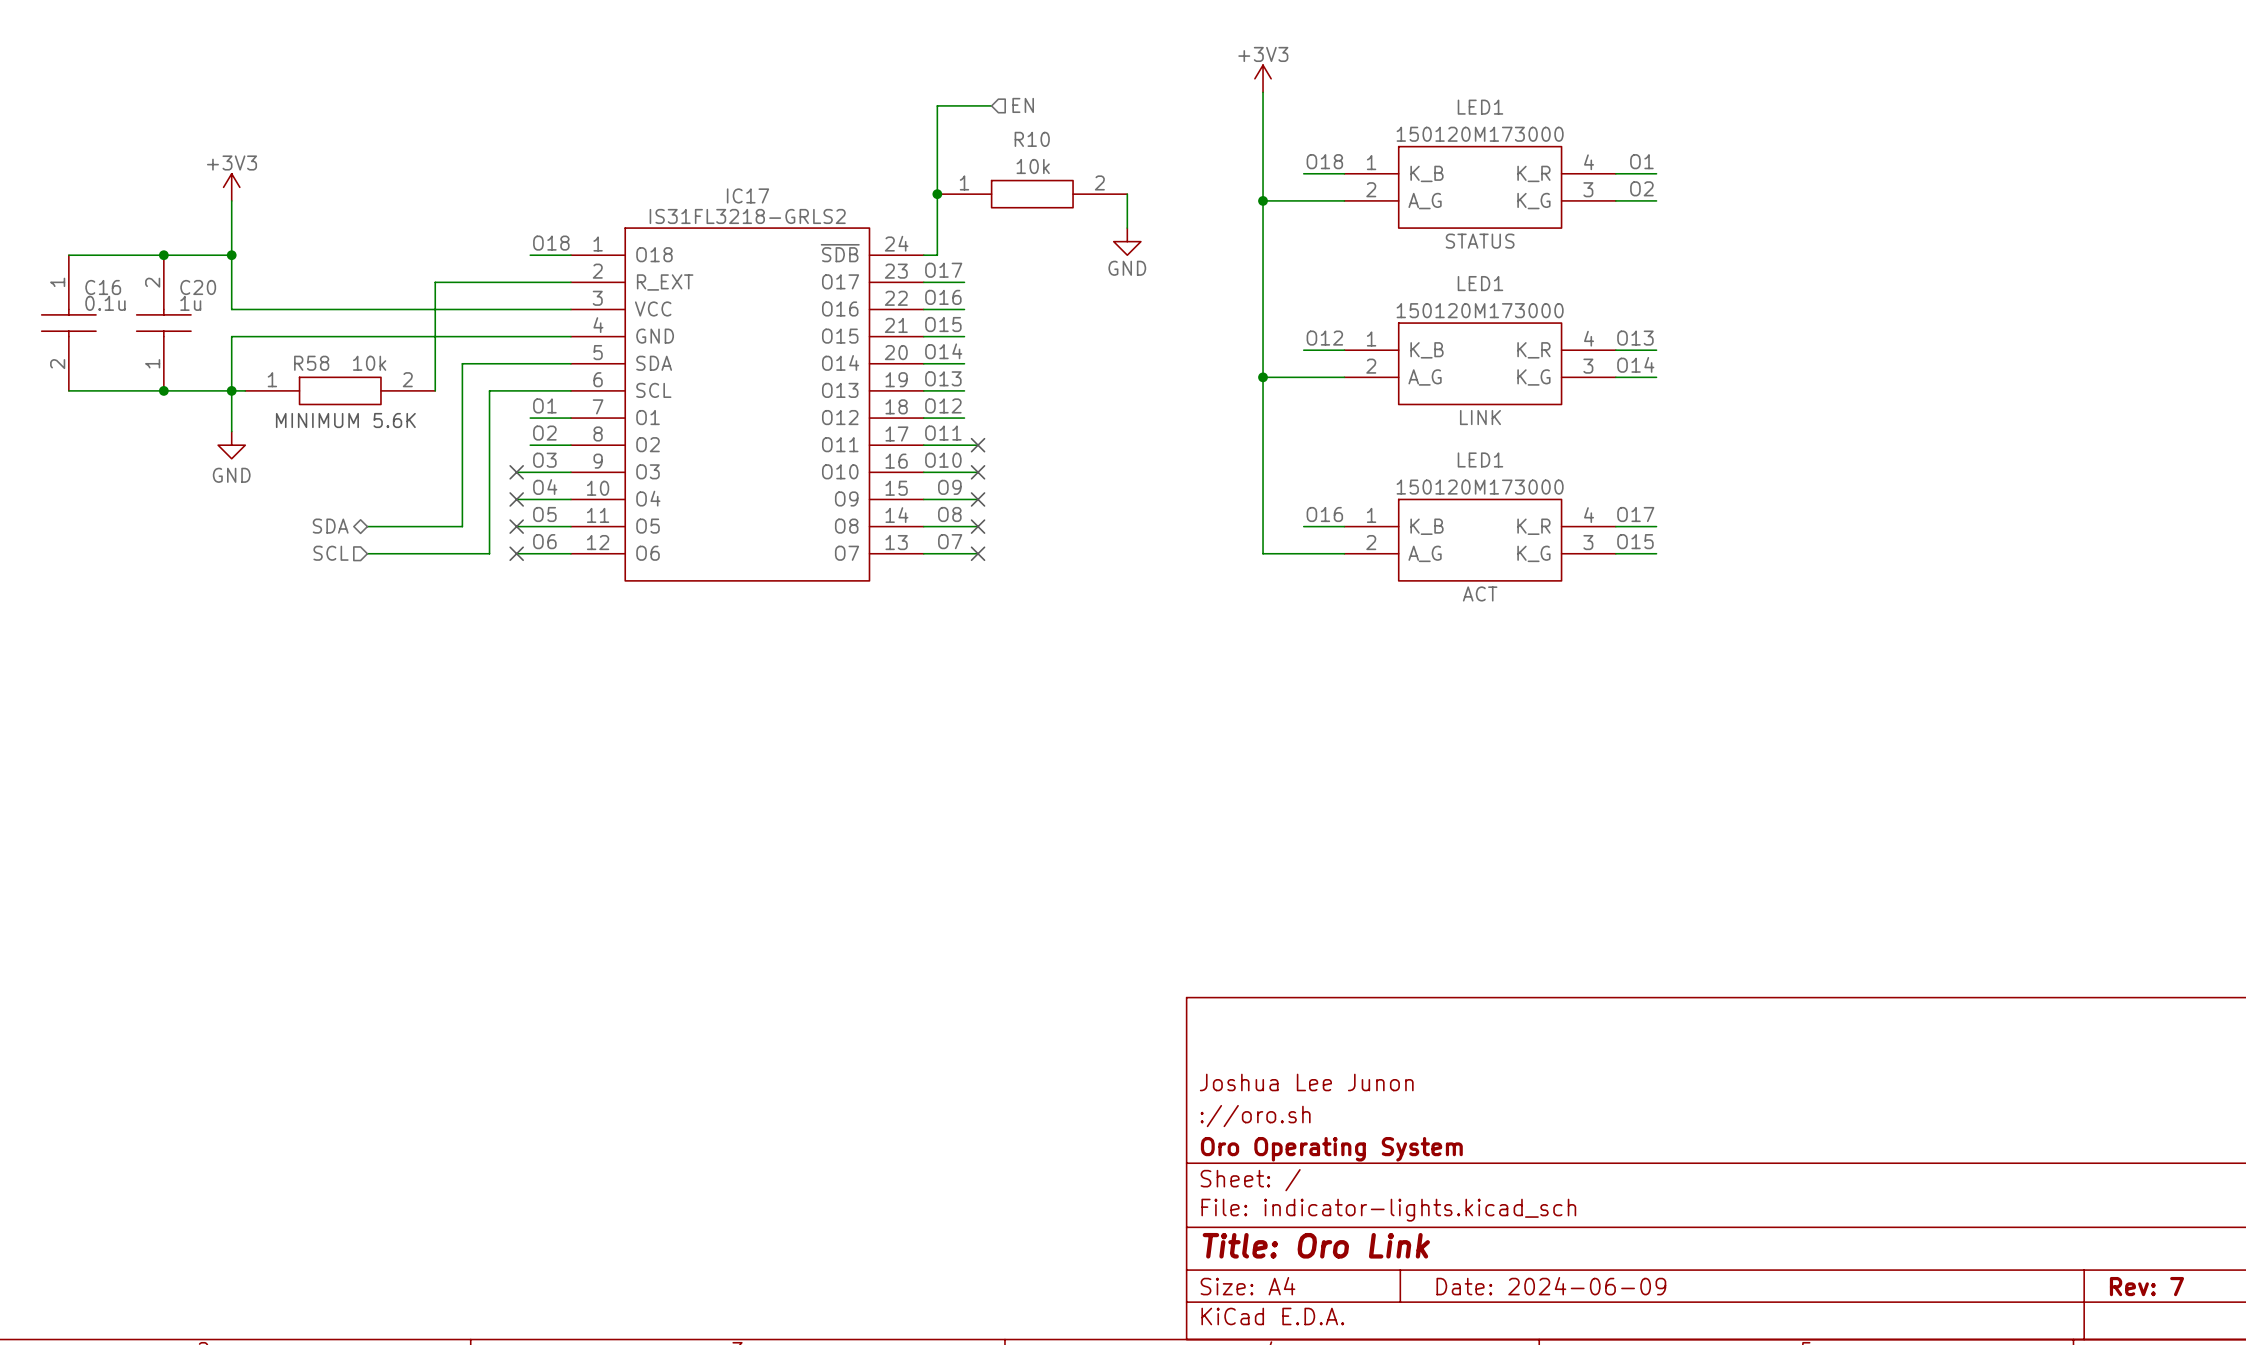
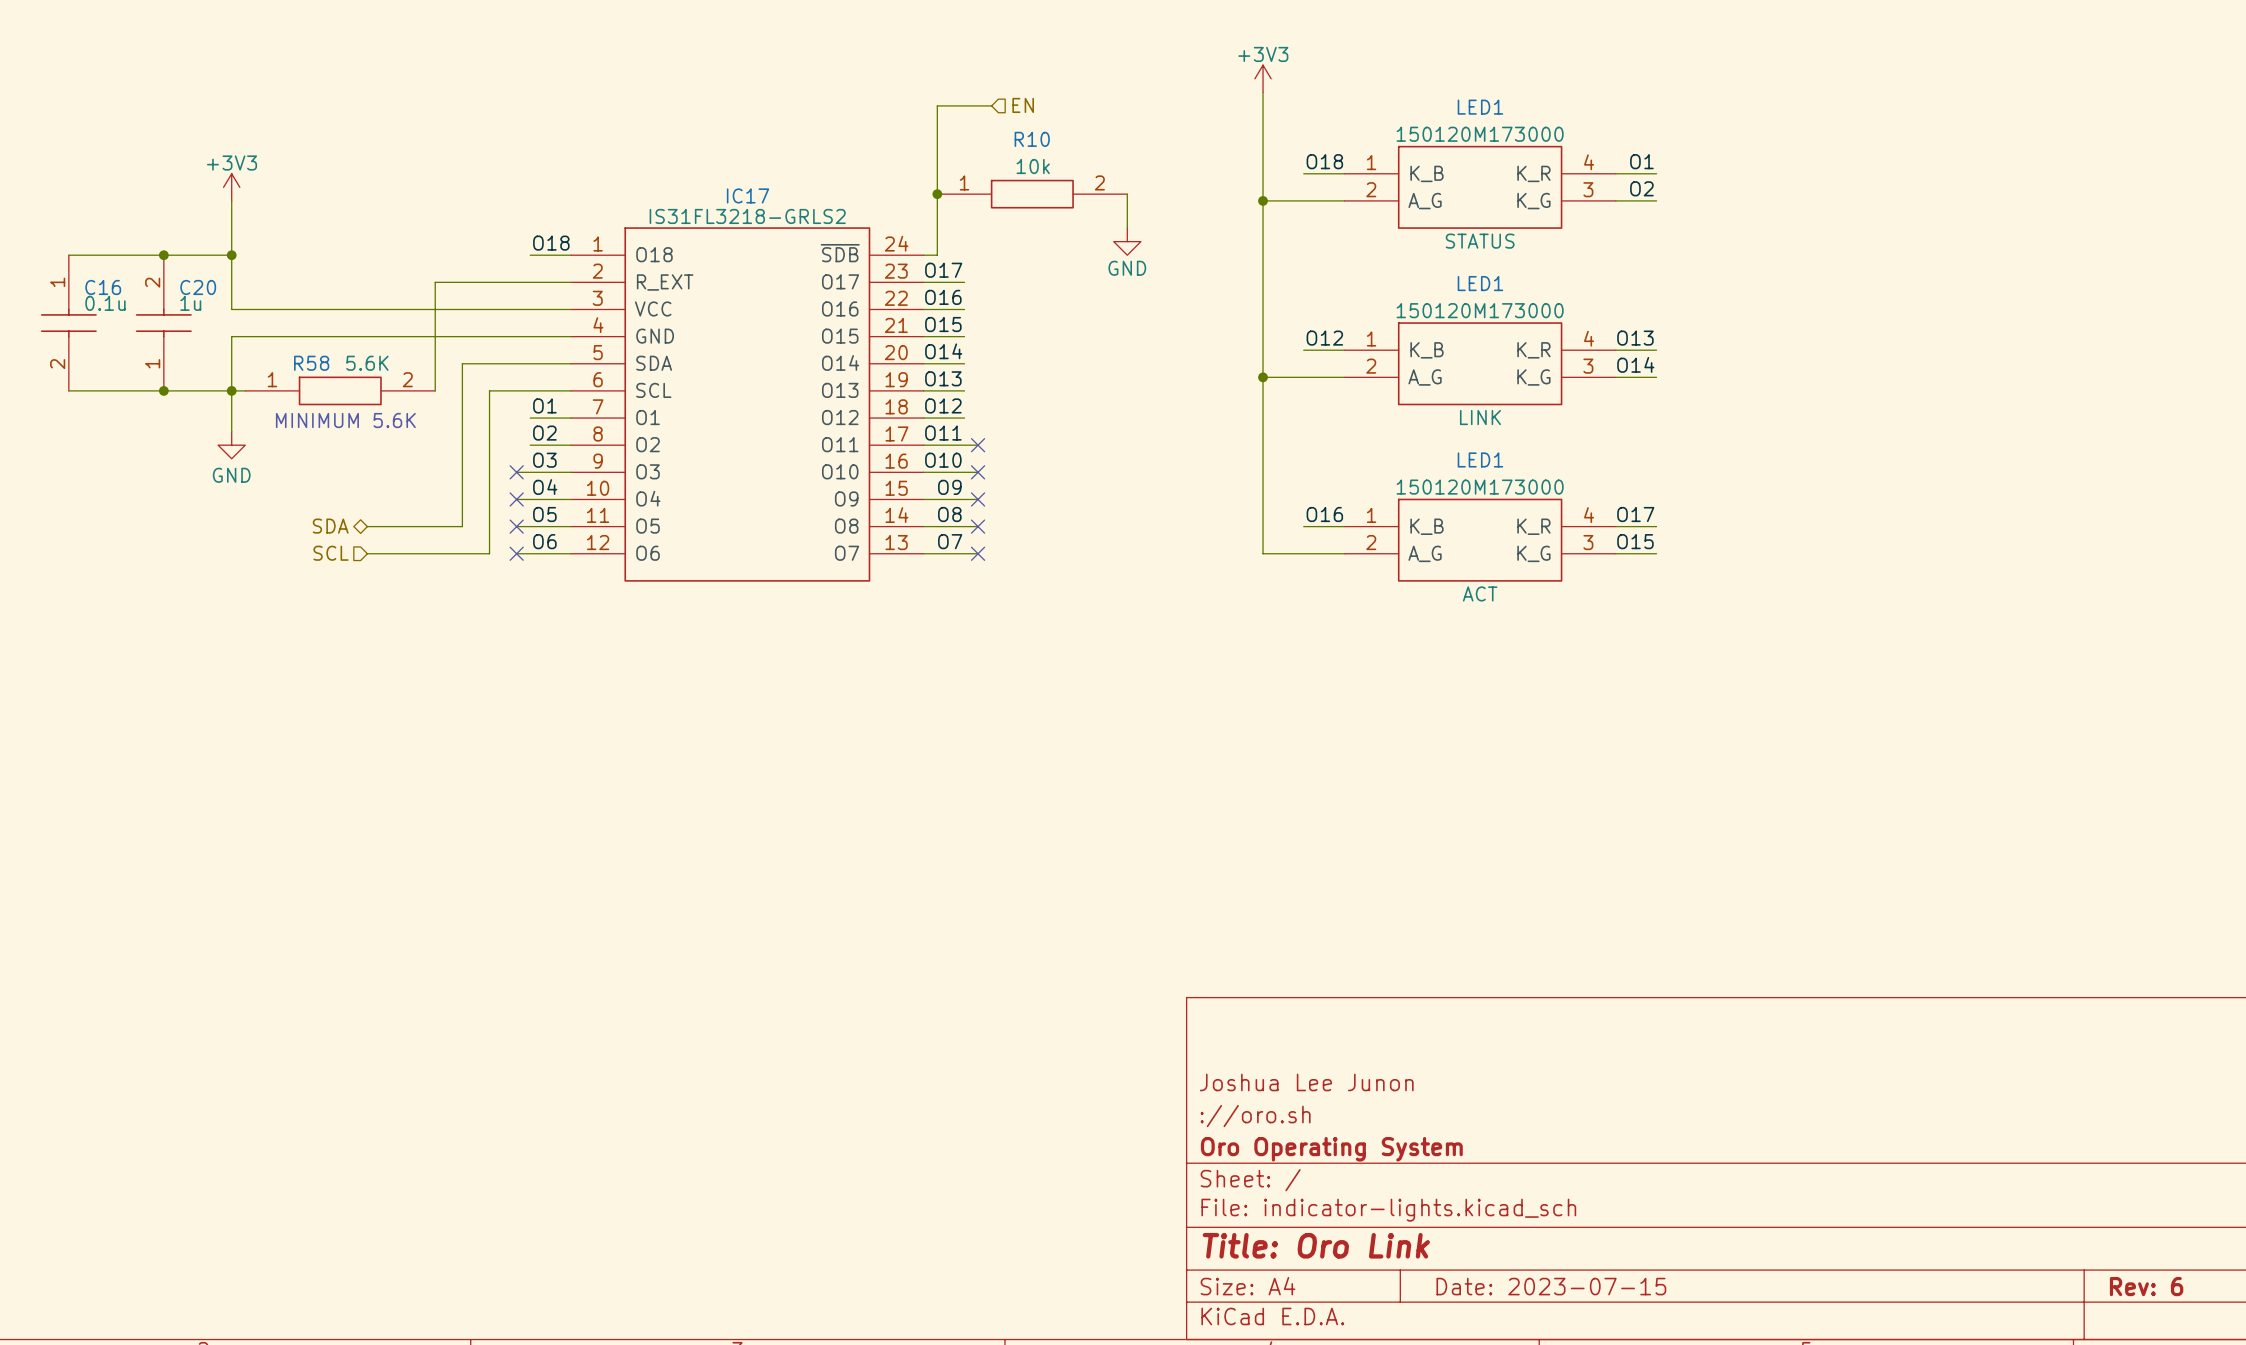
R58 value: 10k (369, 363) -> 5.6K (367, 363)
title block: Date: 2024-06-09 (1551, 1286) -> Date: 2023-07-15 (1551, 1286)
title block: Rev: 7 (2146, 1286) -> Rev: 6 (2146, 1286)

